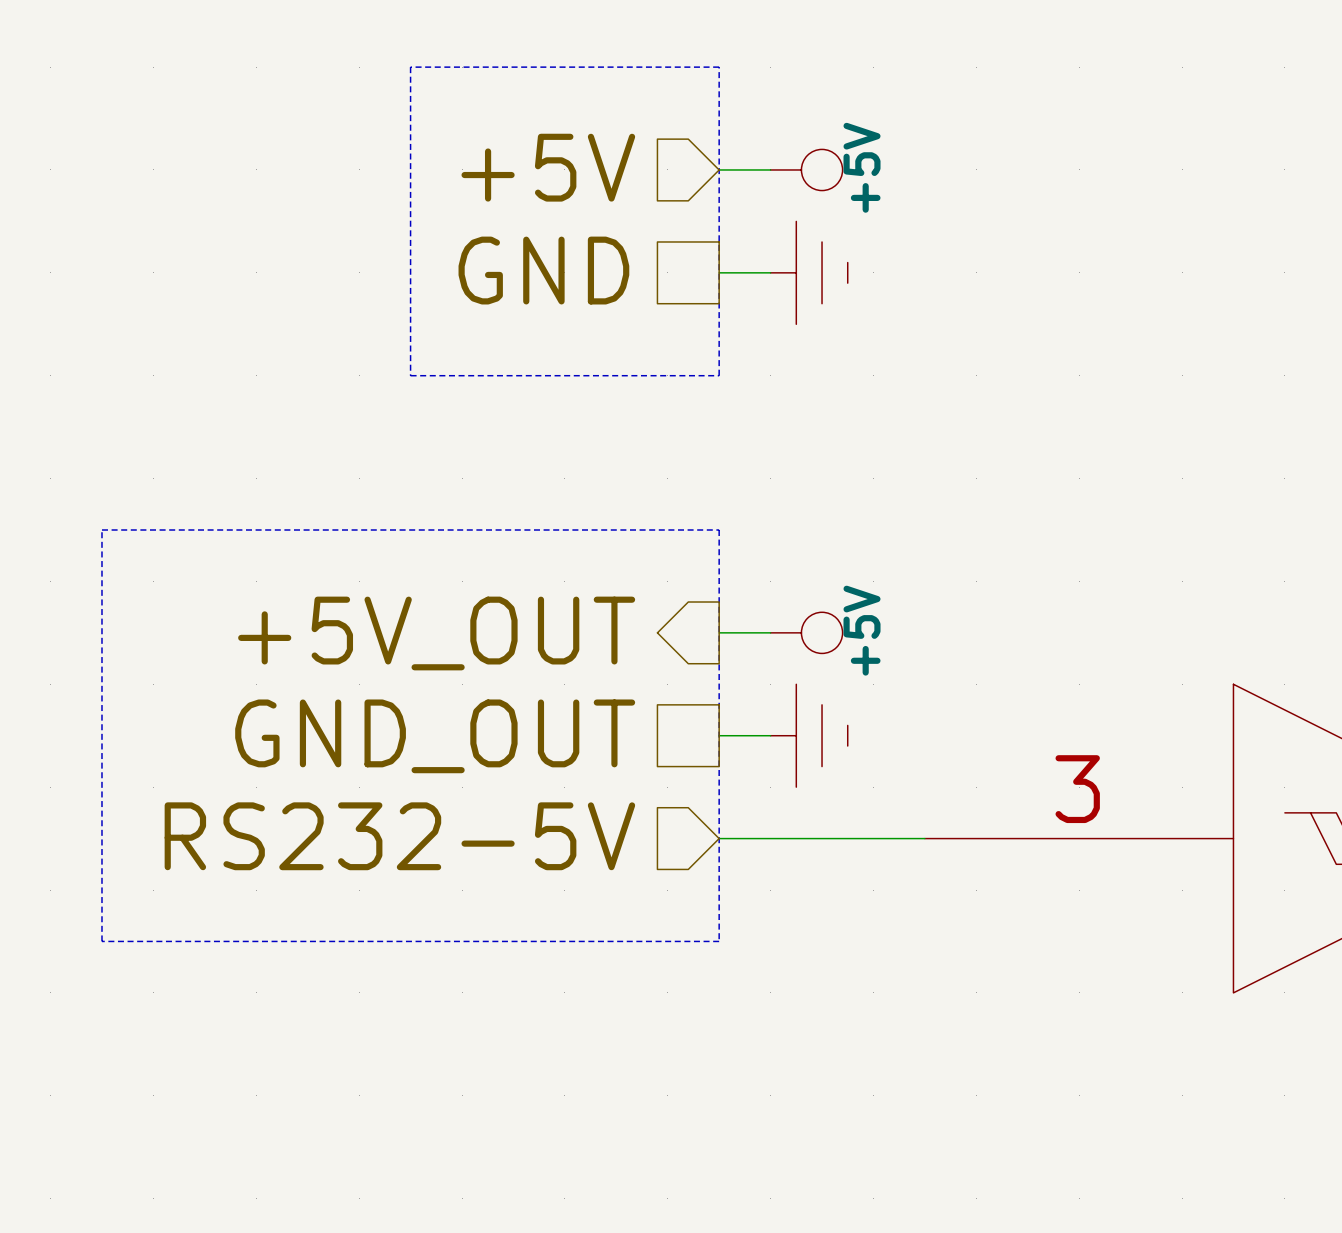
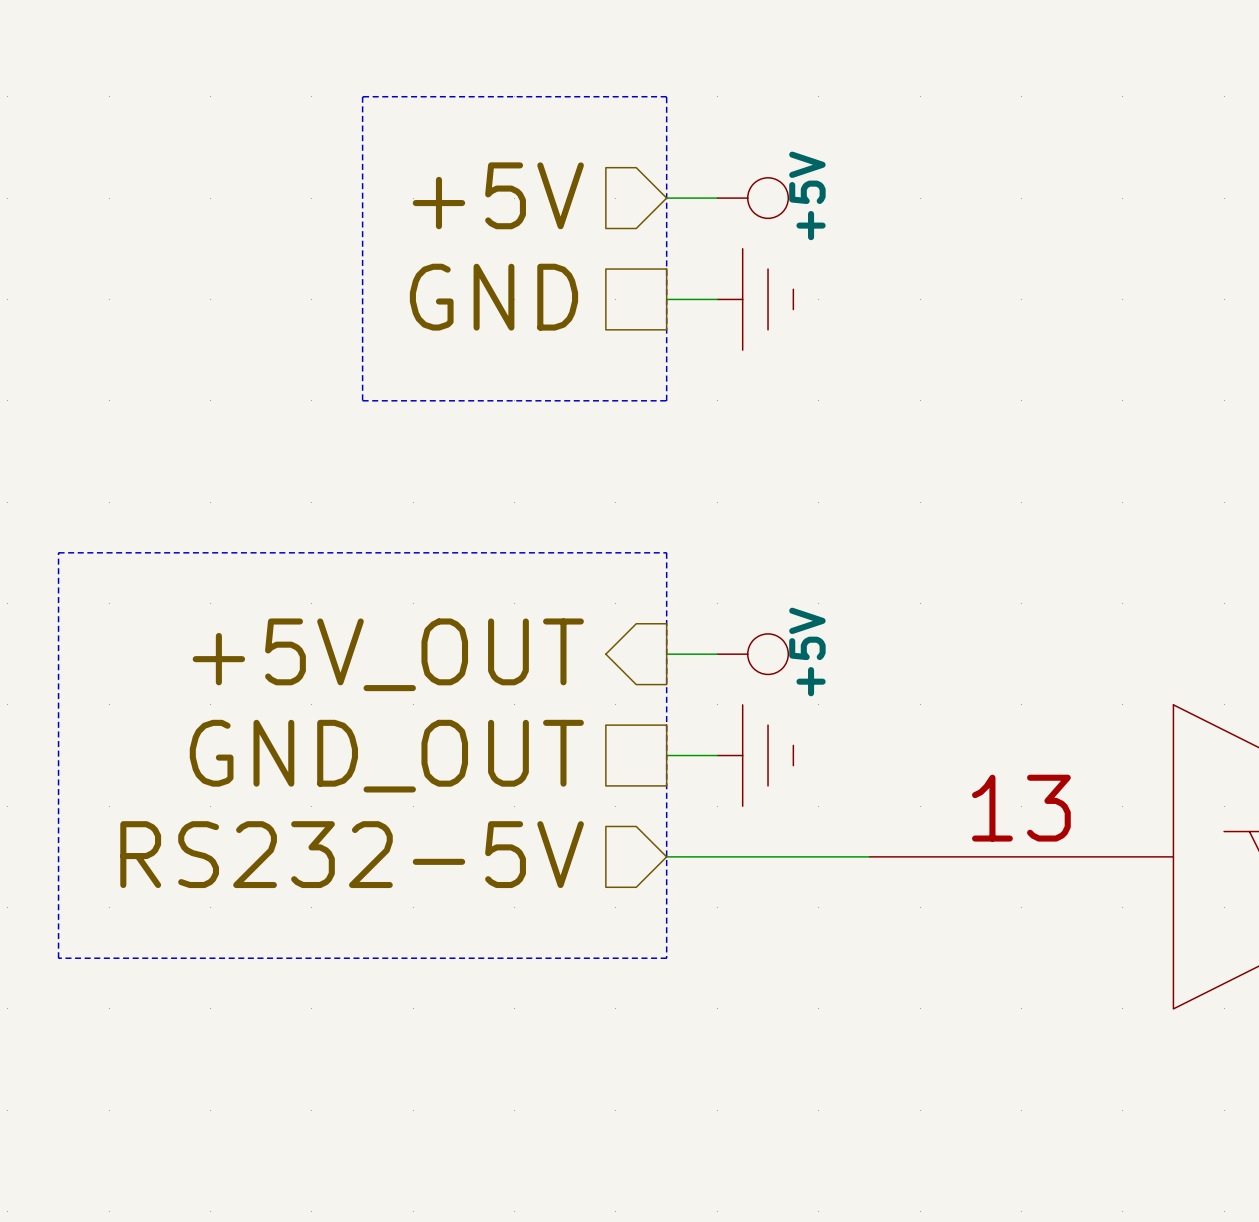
part pin number: 3 (1077, 789) -> 13 (1021, 808)

